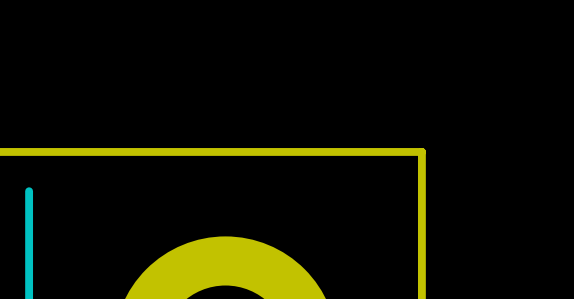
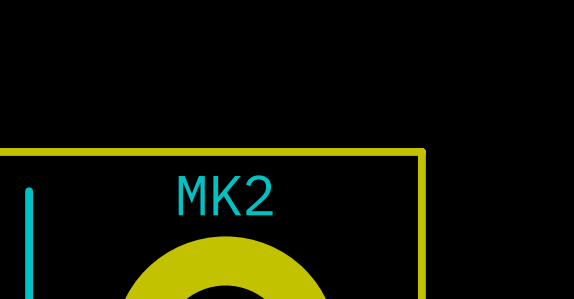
MK2 name: none -> MK2 (225, 195)

